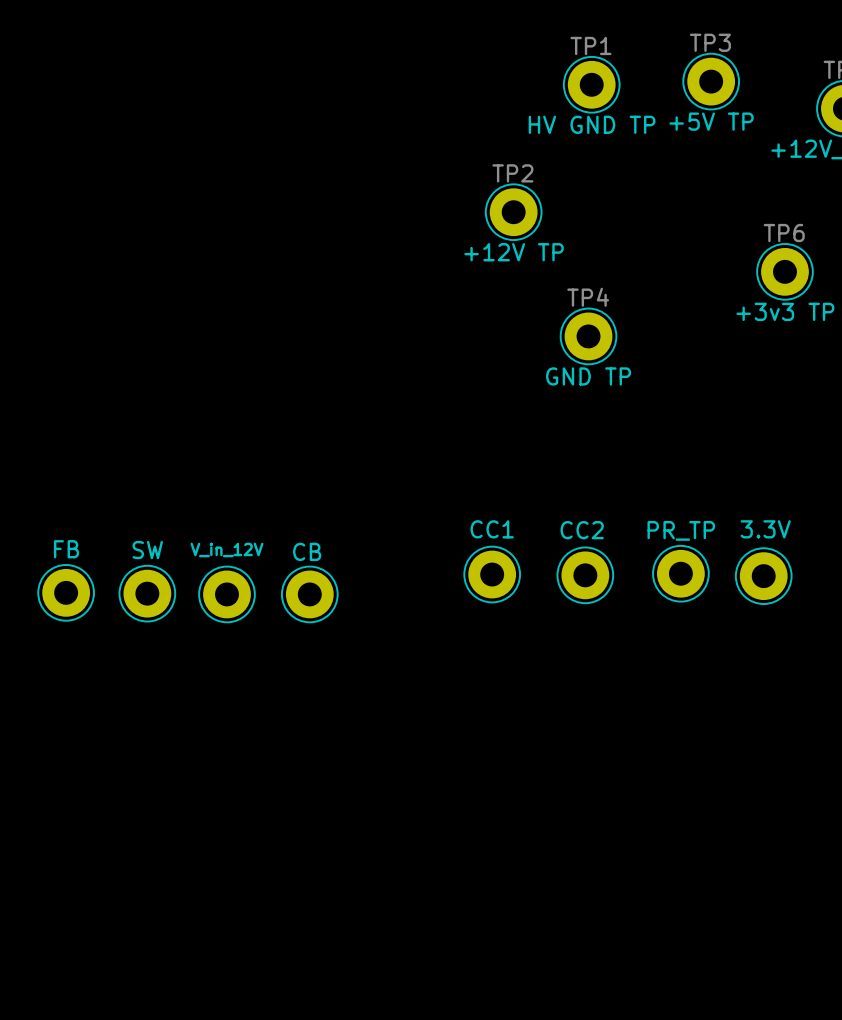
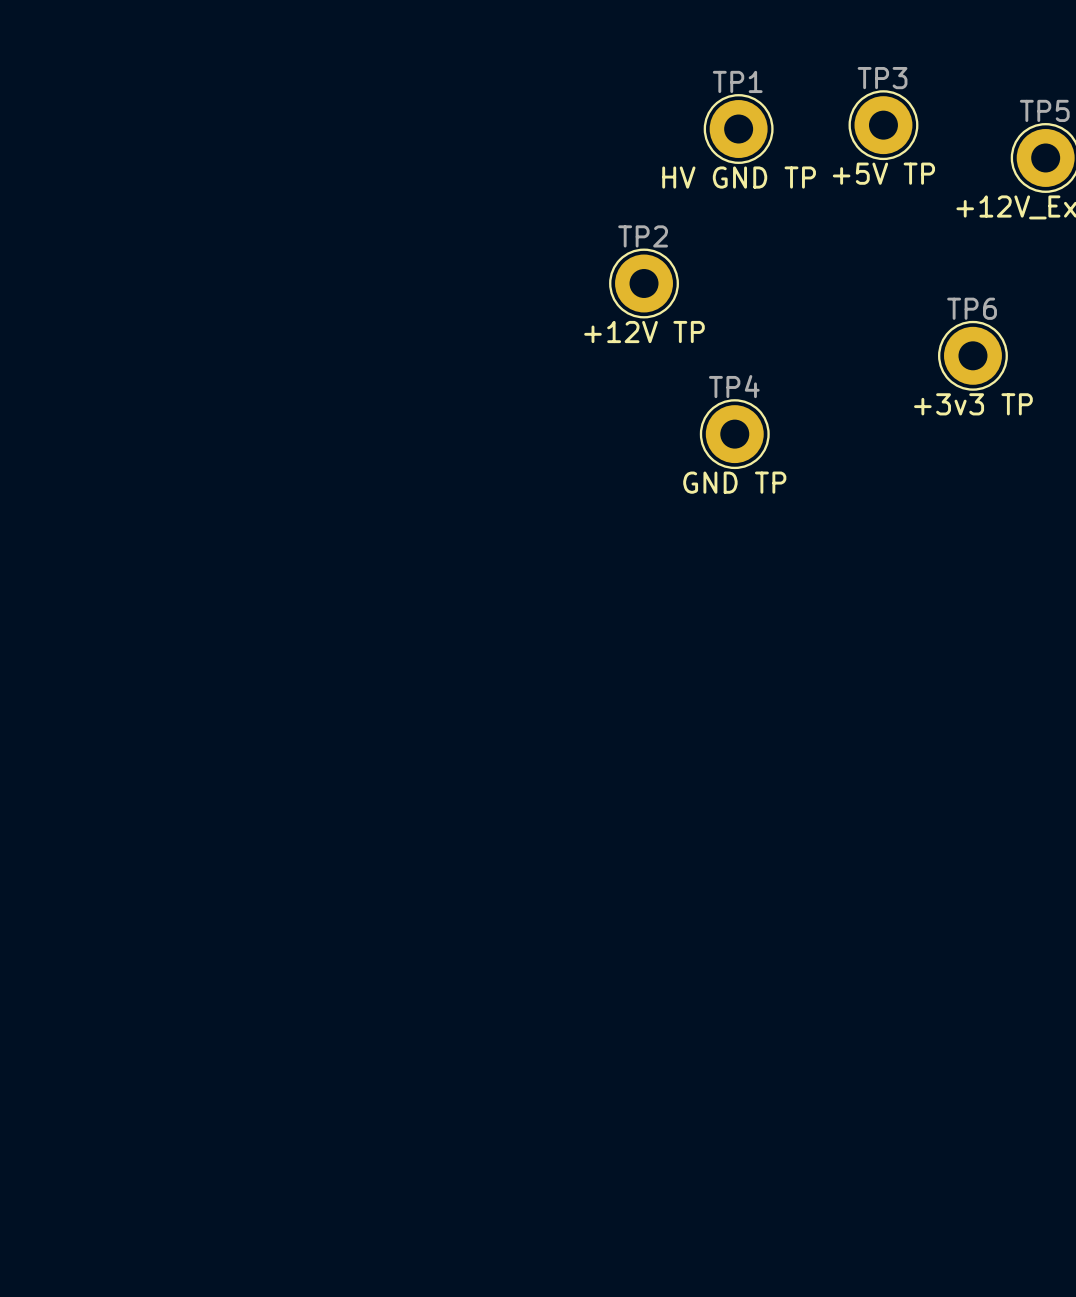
part: PR_TP (680, 573) -> none
part: CC1 (492, 574) -> none
part: CC2 (585, 575) -> none
part: 3.3V (763, 576) -> none
part: FB (66, 592) -> none
part: SW (147, 593) -> none
part: V_in_12V (226, 594) -> none
part: CB (309, 594) -> none

